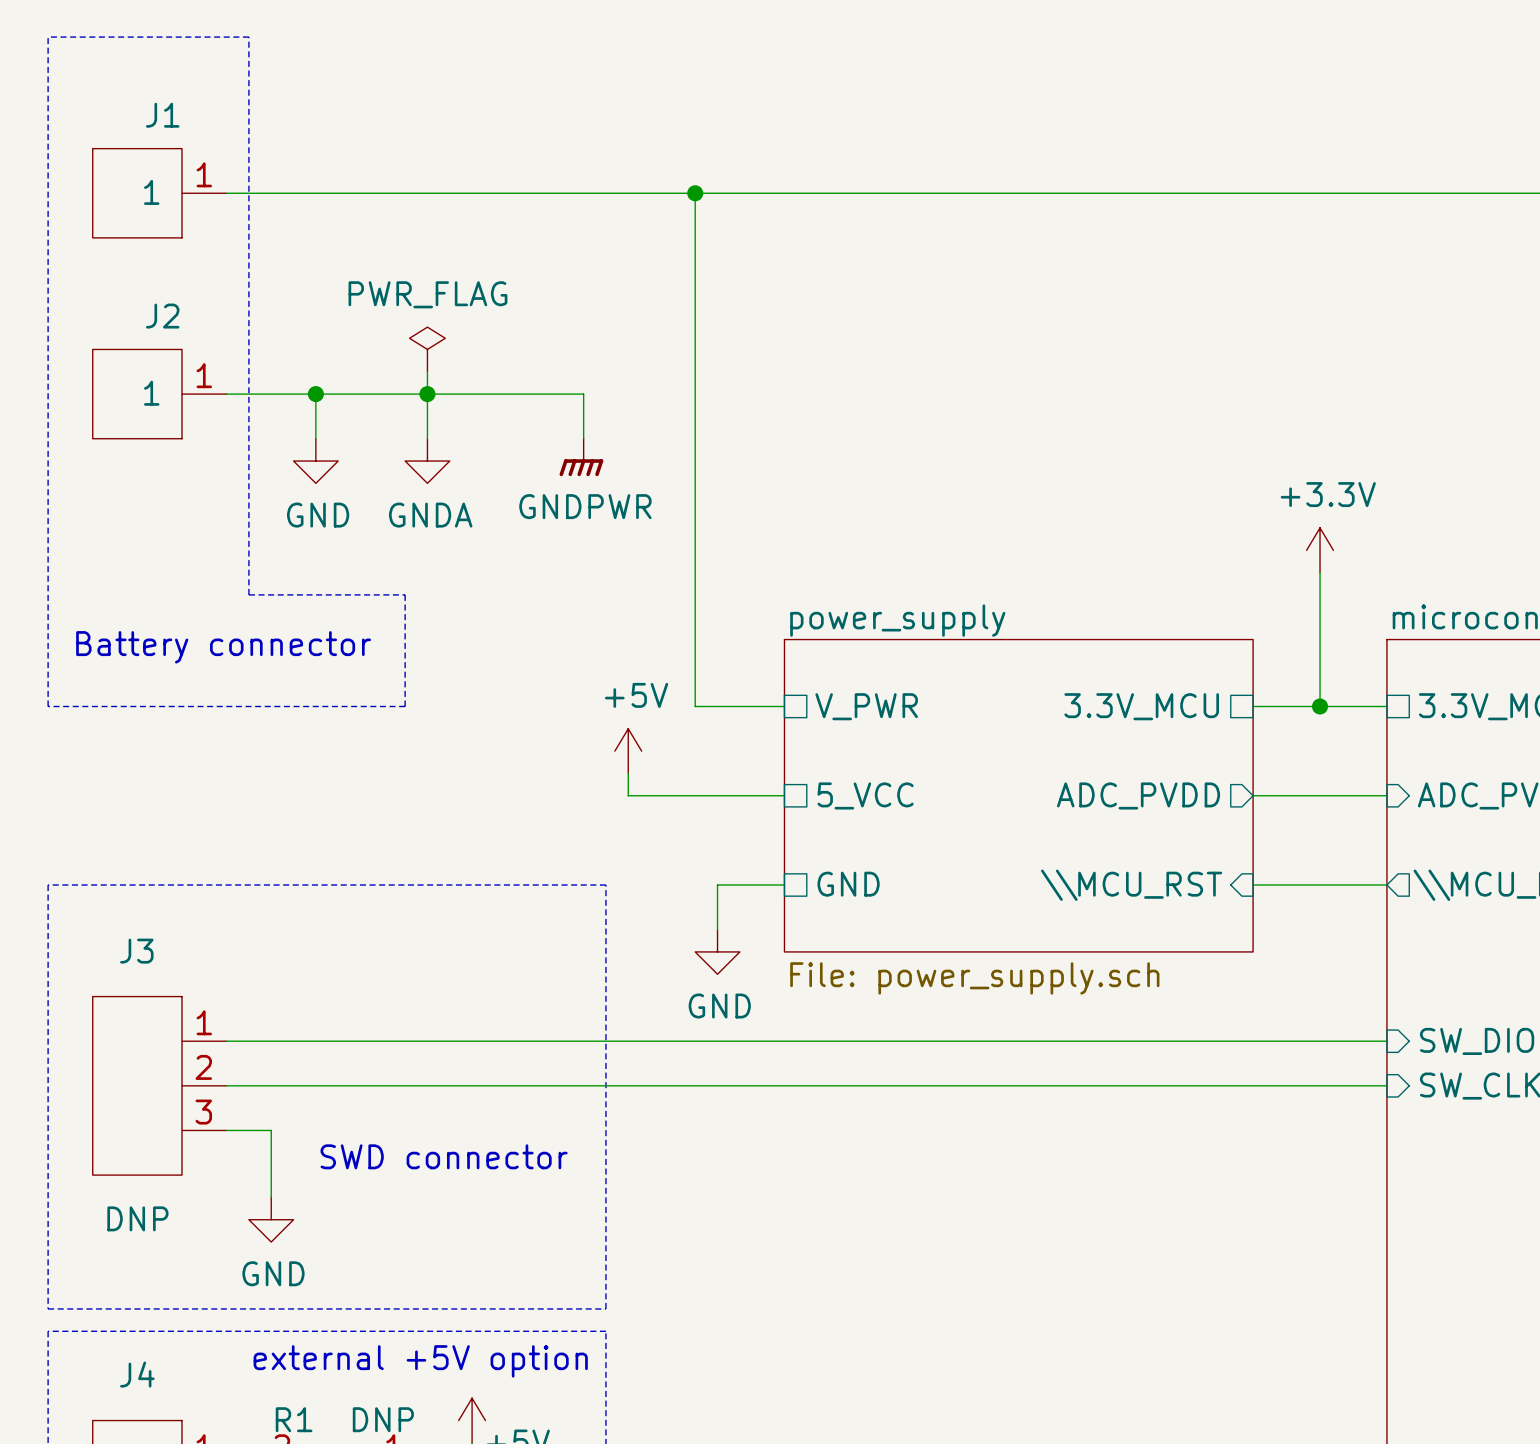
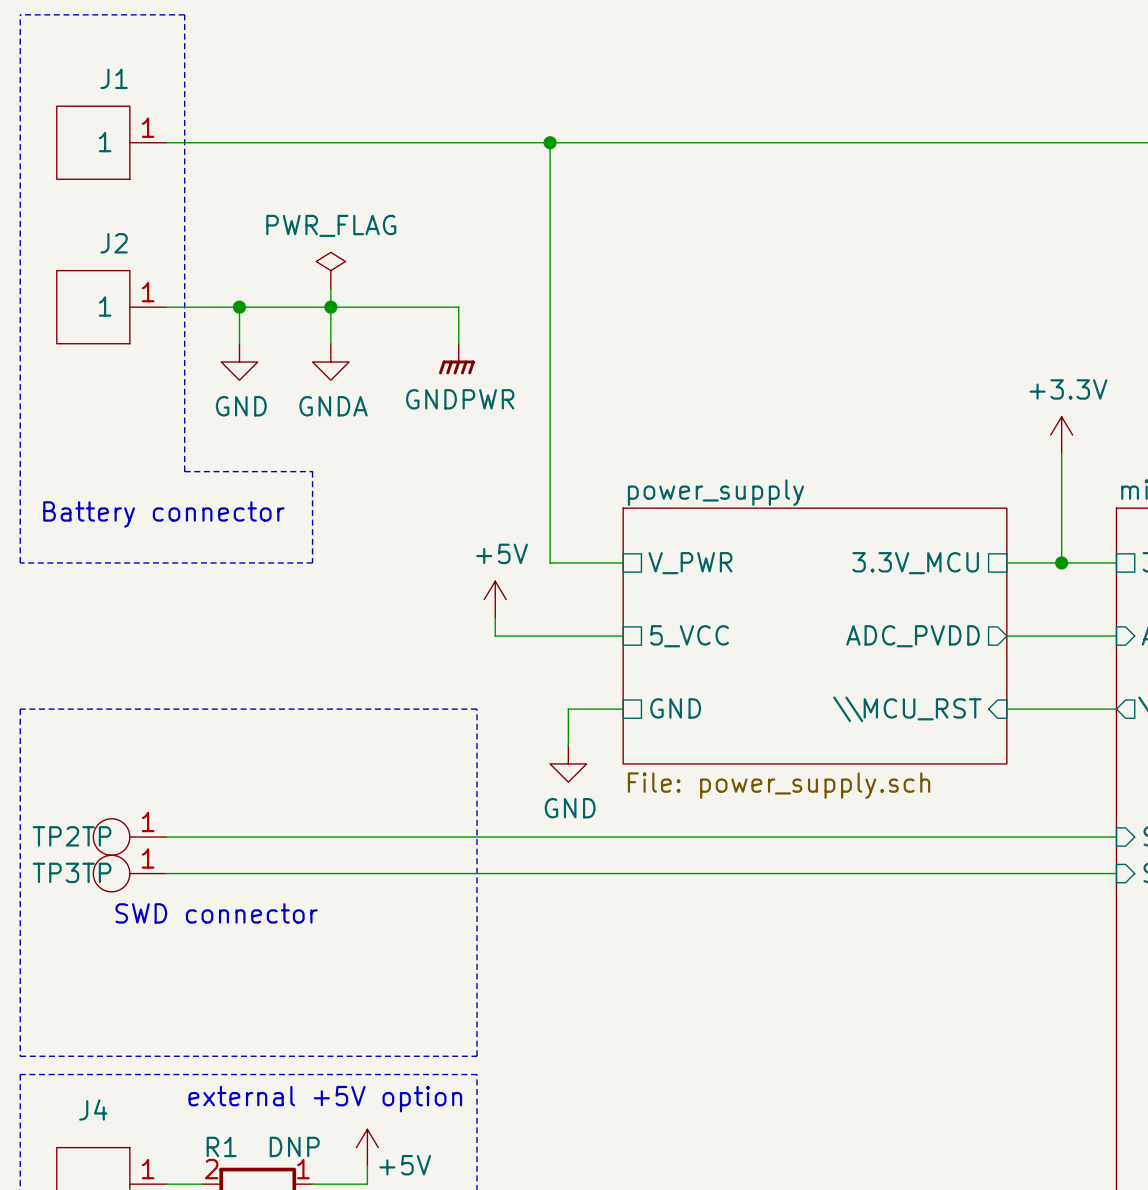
TP2: none -> (129, 837)
J3: DNP (159, 1085) -> none
TP3: none -> (129, 873)
wire: (226, 1130) (271, 1130) (271, 1197) -> none
text position: SWD connector (444, 1156) -> SWD connector (216, 913)
power symbol: GND (271, 1219) -> none

